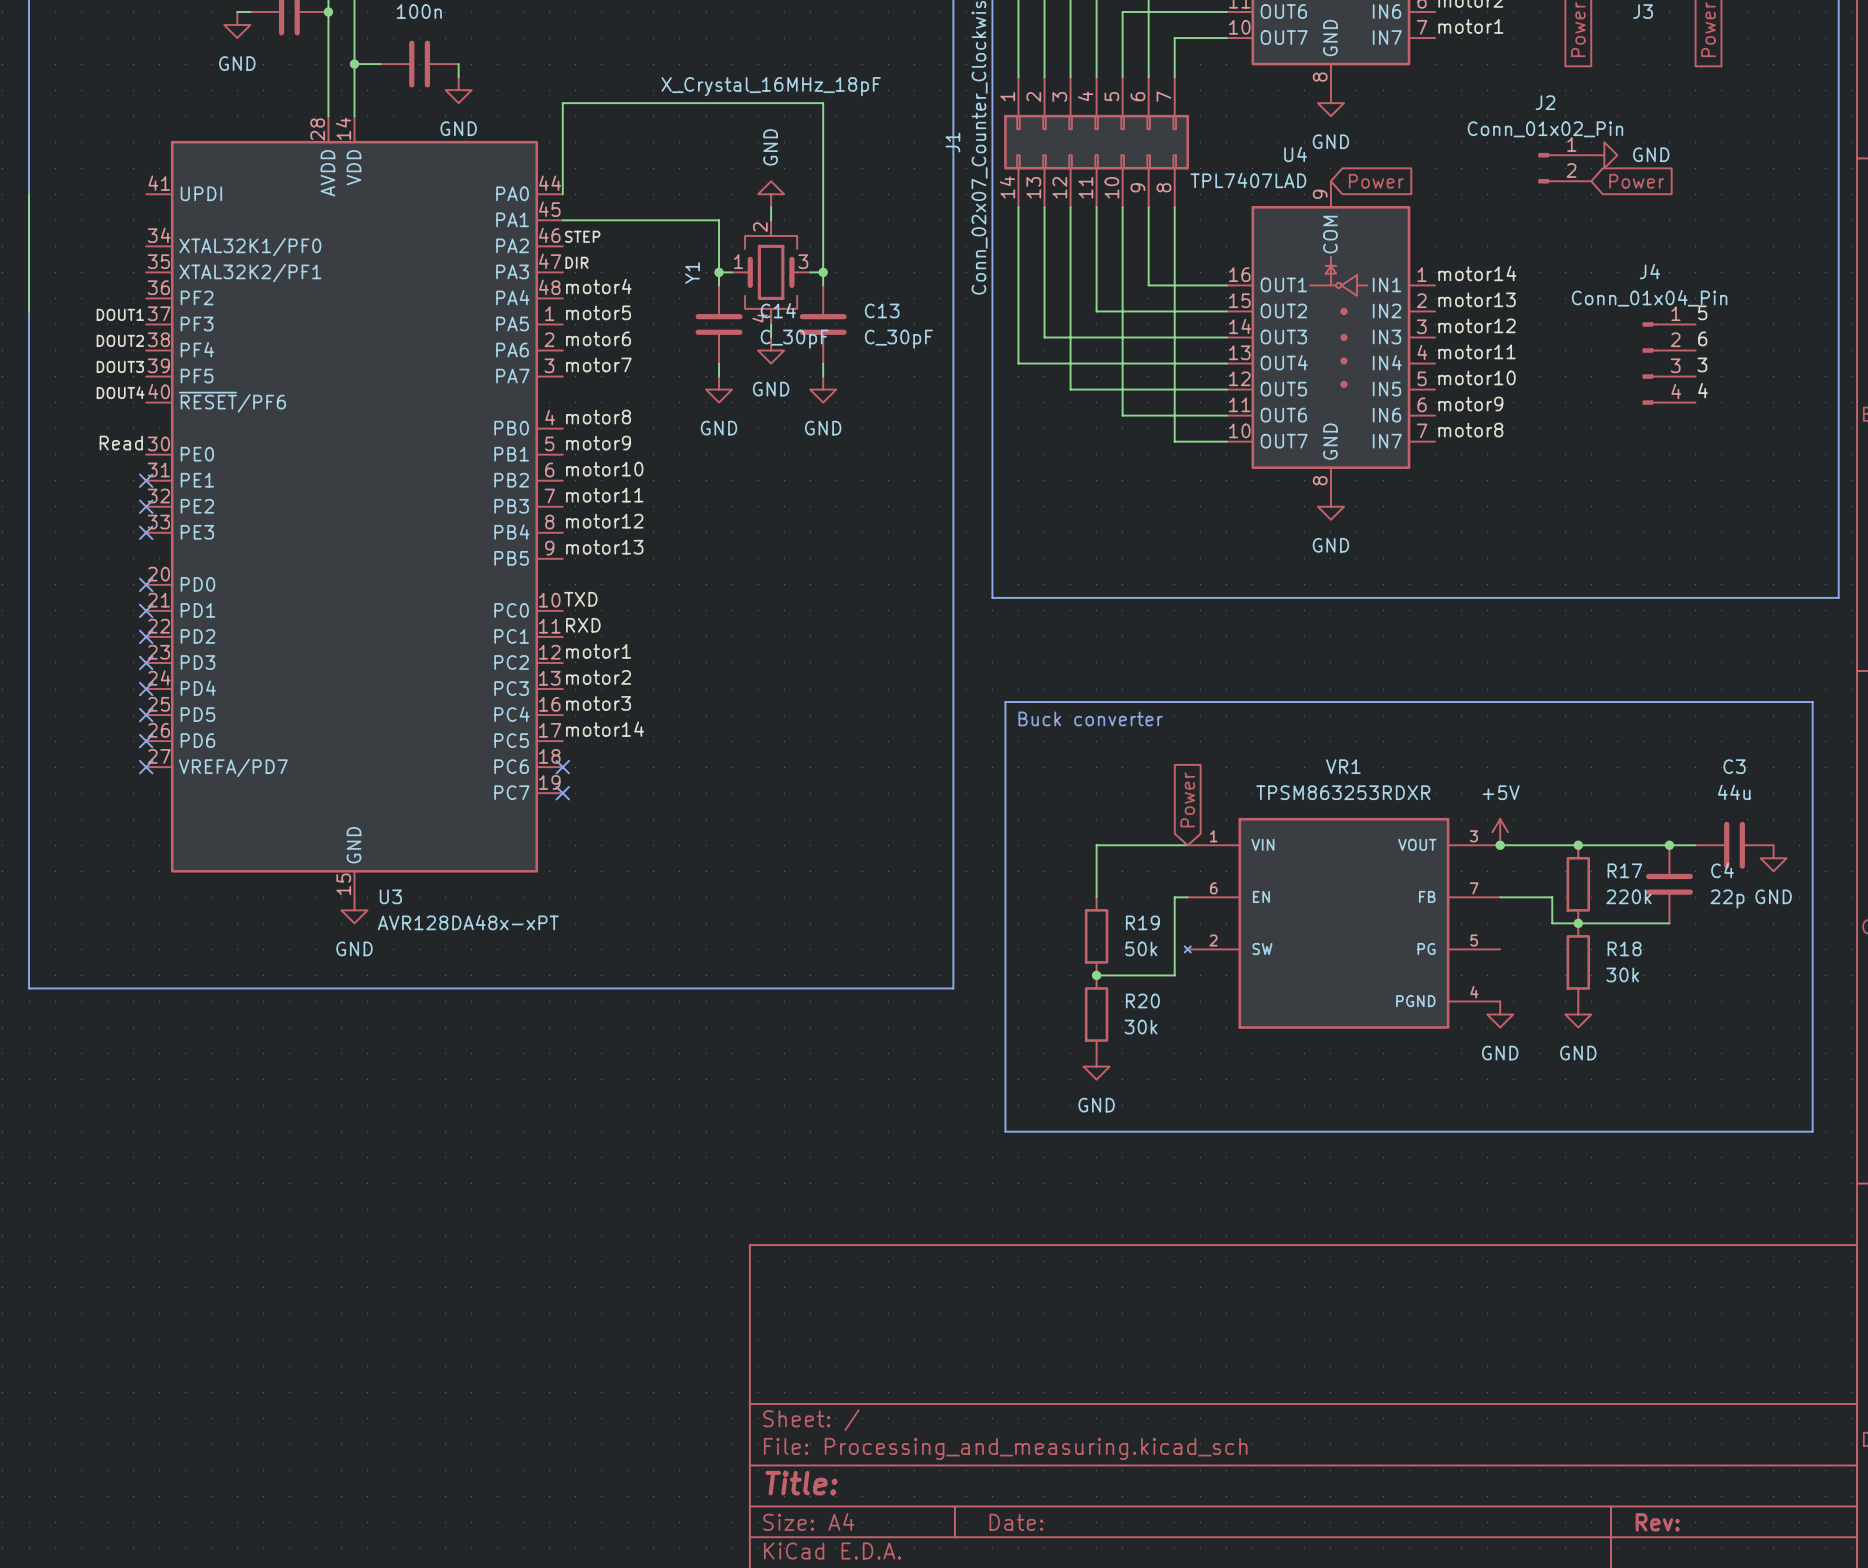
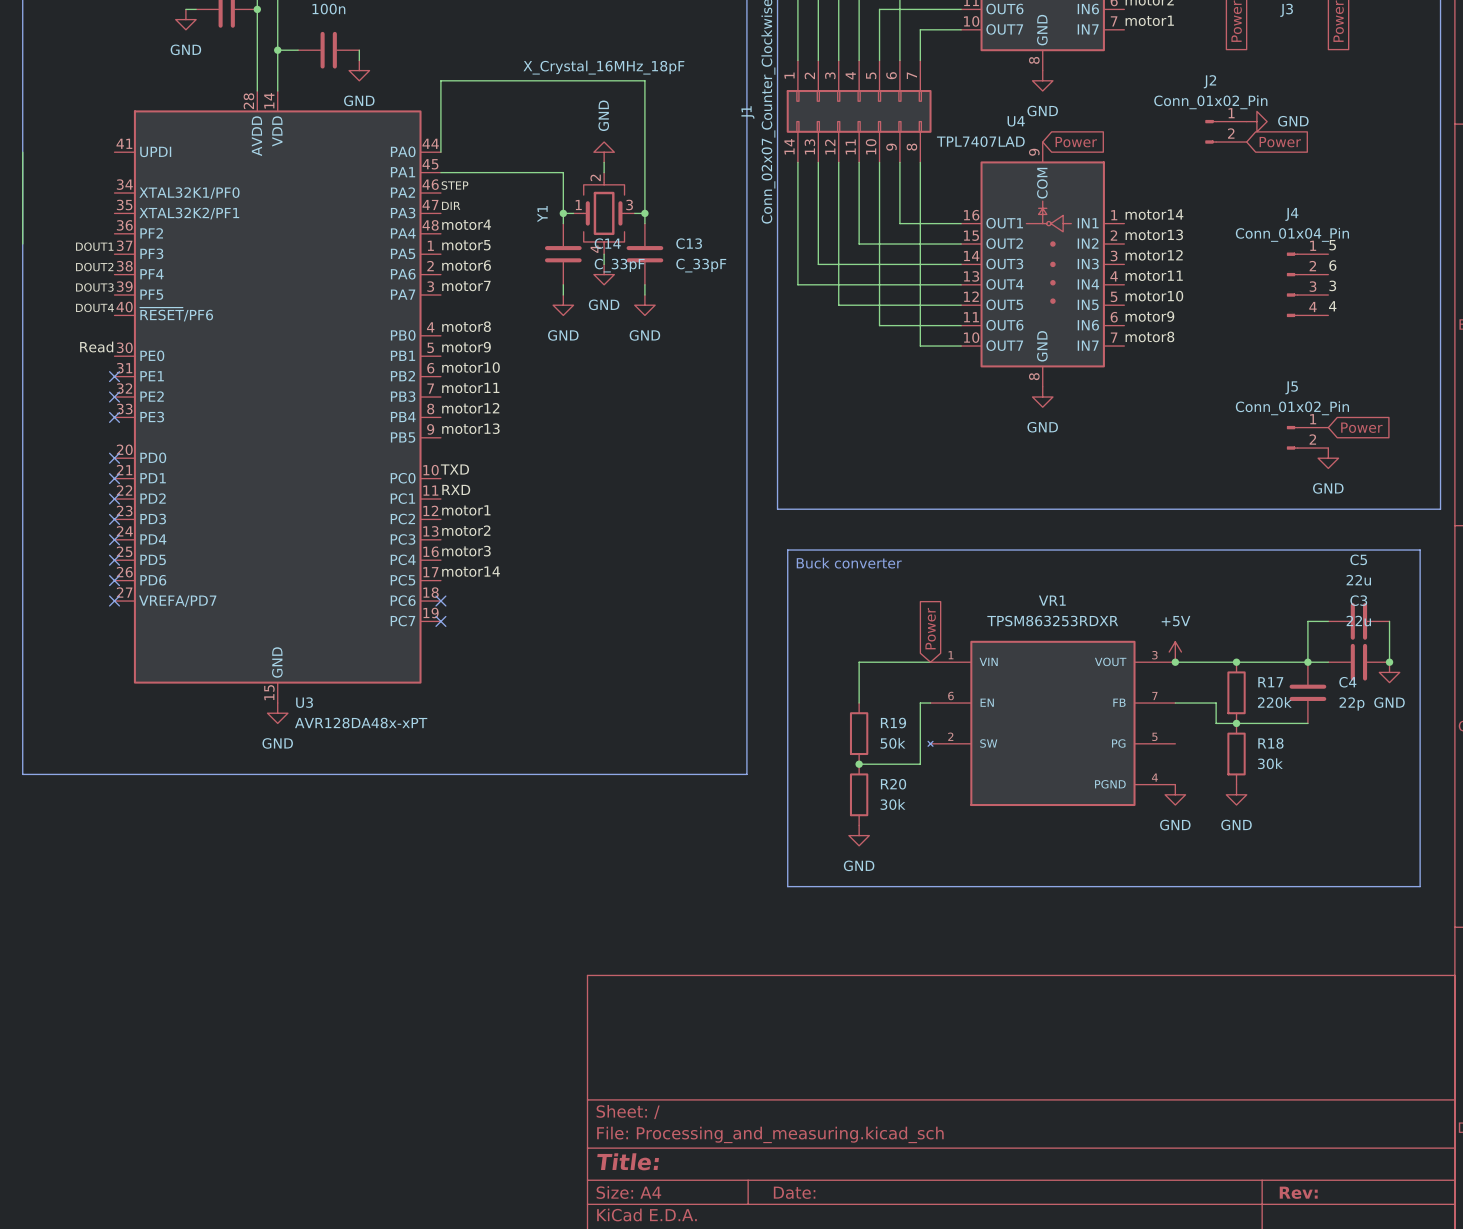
C14 value: C_30pF (794, 339) -> C_33pF (619, 265)
C13 value: C_30pF (898, 339) -> C_33pF (701, 265)
global label: none -> Power (1361, 427)
J5: none -> Conn_01x02_Pin (1307, 437)
power symbol: none -> GND (1328, 458)
line: (992, 597) (1838, 597) -> (777, 468) (777, 509) (1440, 509) (1440, 468)
C3 value: 44u (1734, 792) -> 22u (1358, 621)
wire: none -> (1328, 621) (1307, 621) (1307, 662)
C5: none -> 22u (1358, 621)
wire: none -> (1389, 621) (1389, 662)
junction: none -> (1389, 662)

